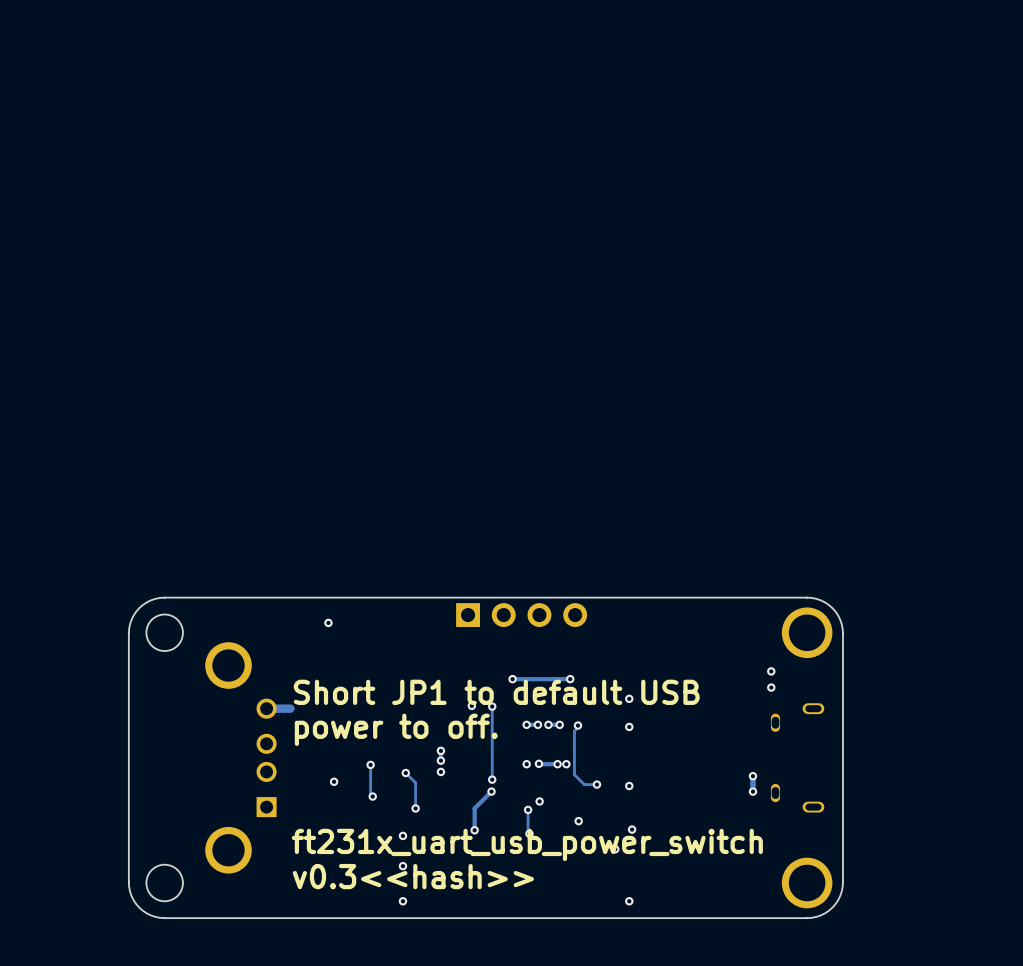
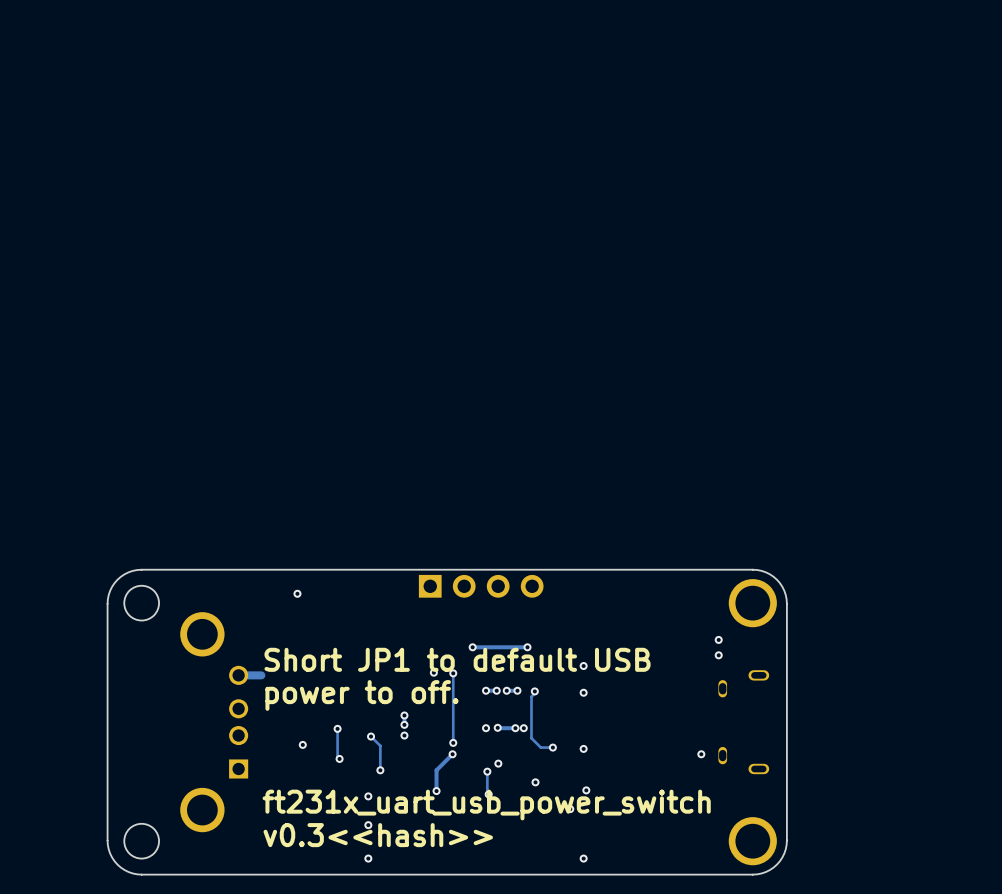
track: (752, 776) (752, 791) -> none
via: (752, 776) -> none

